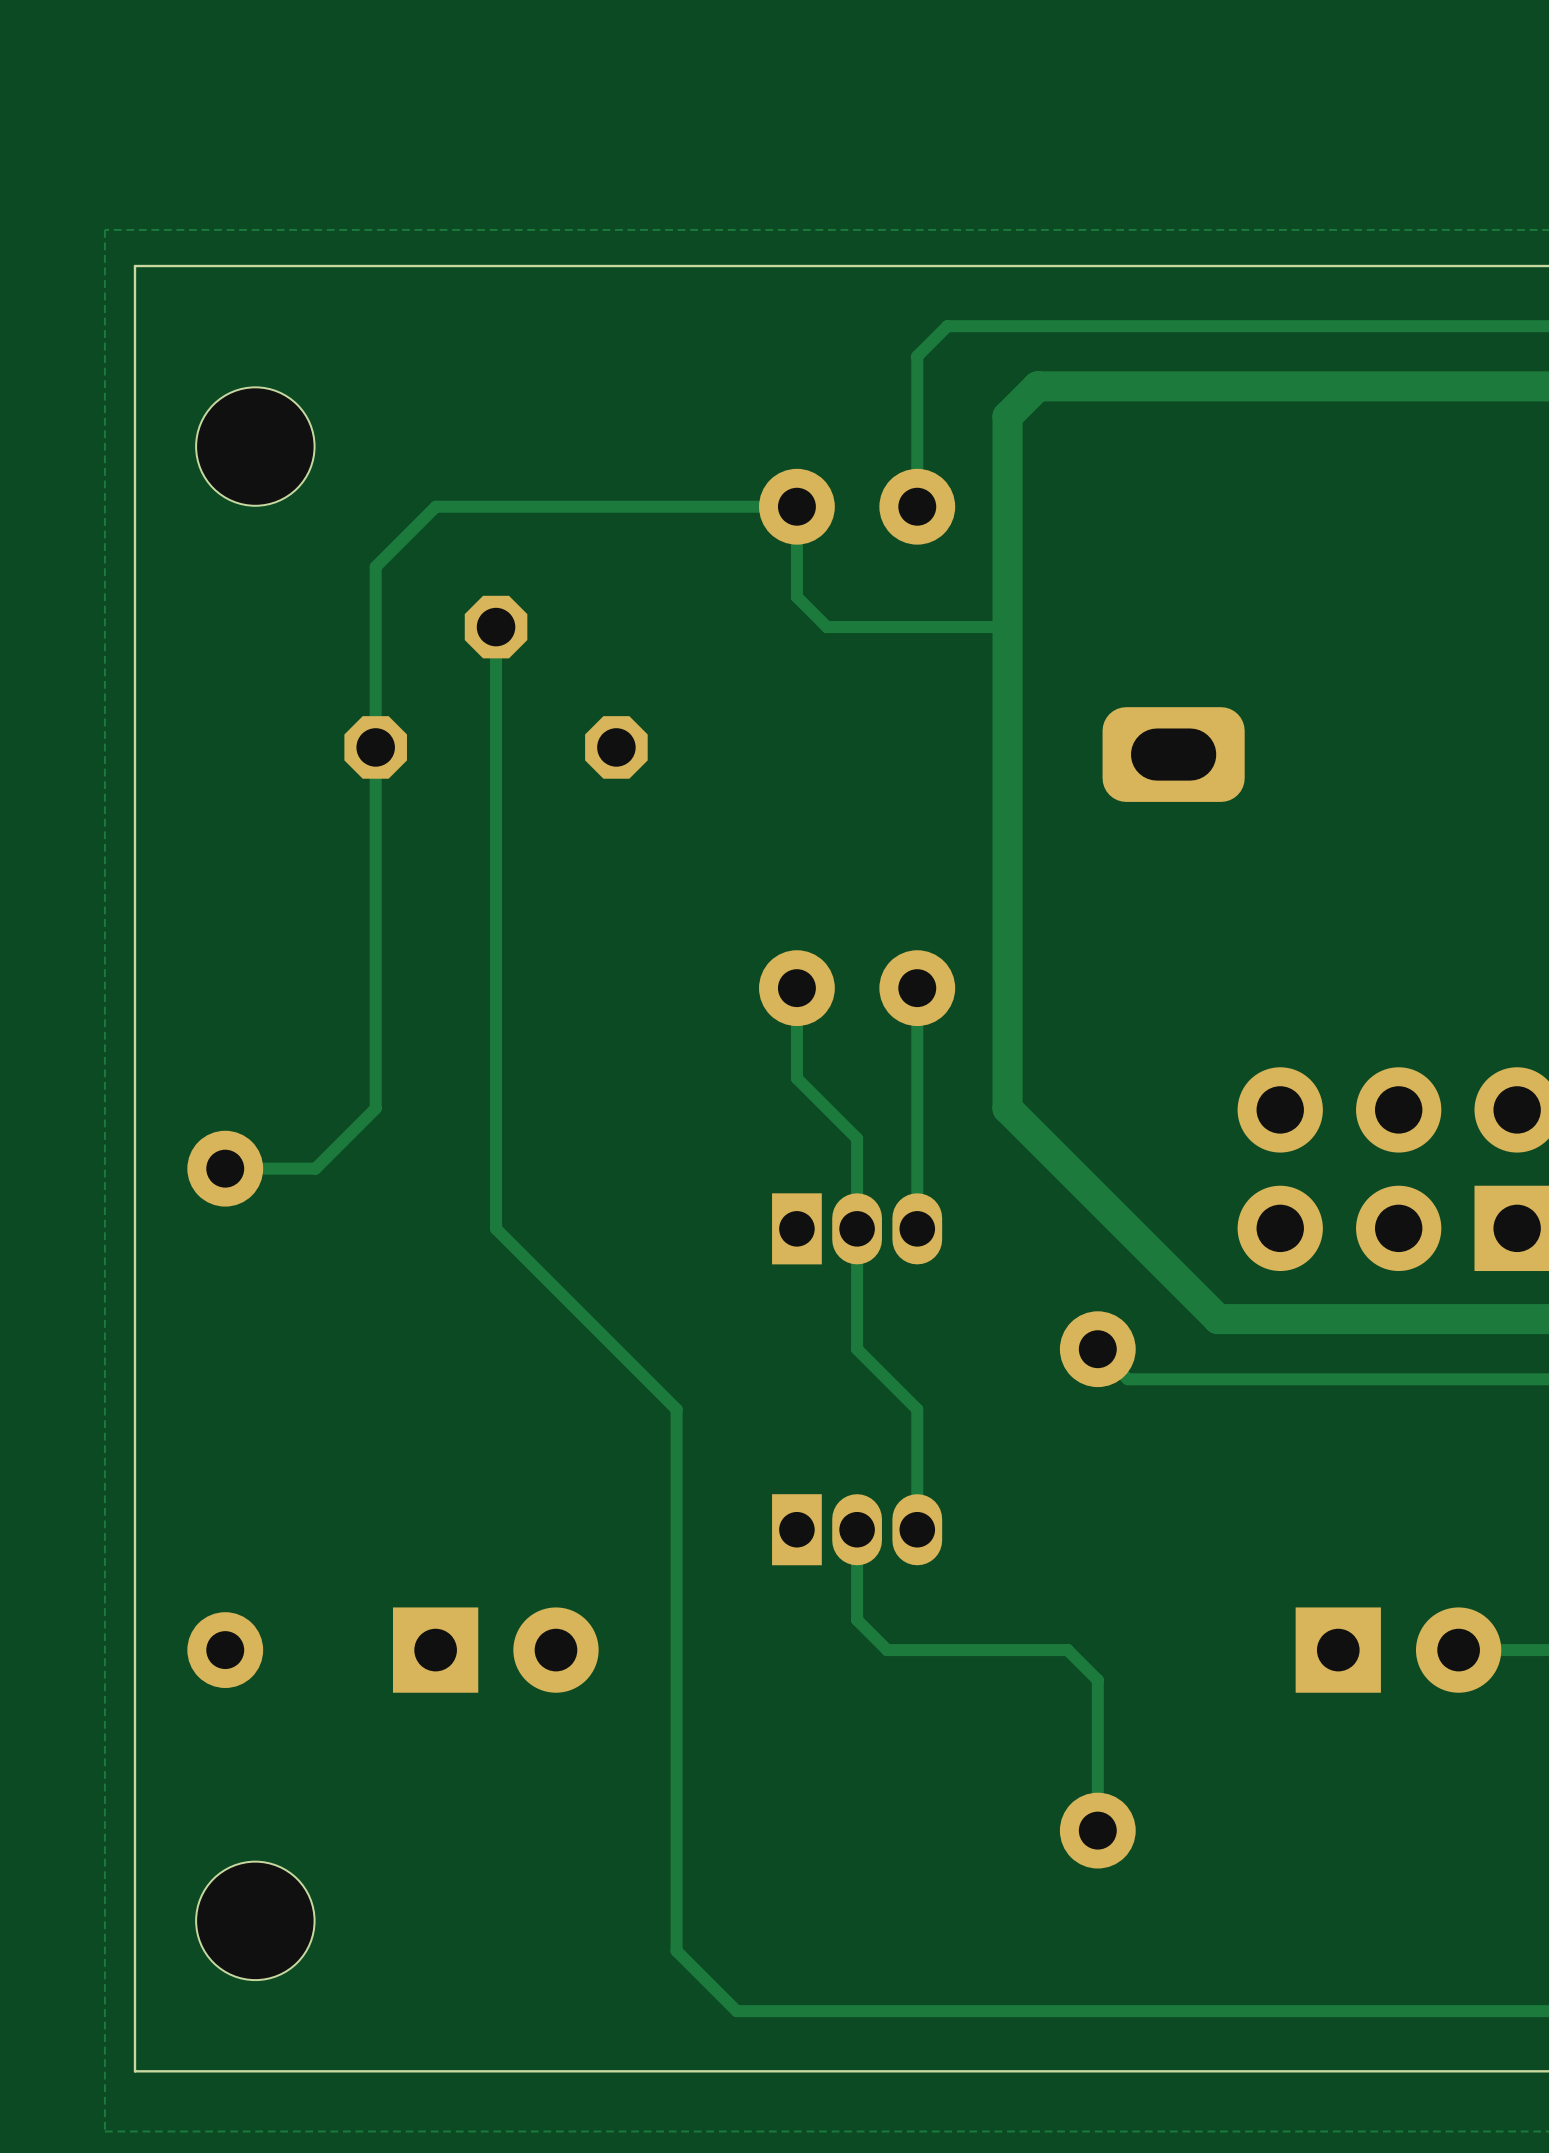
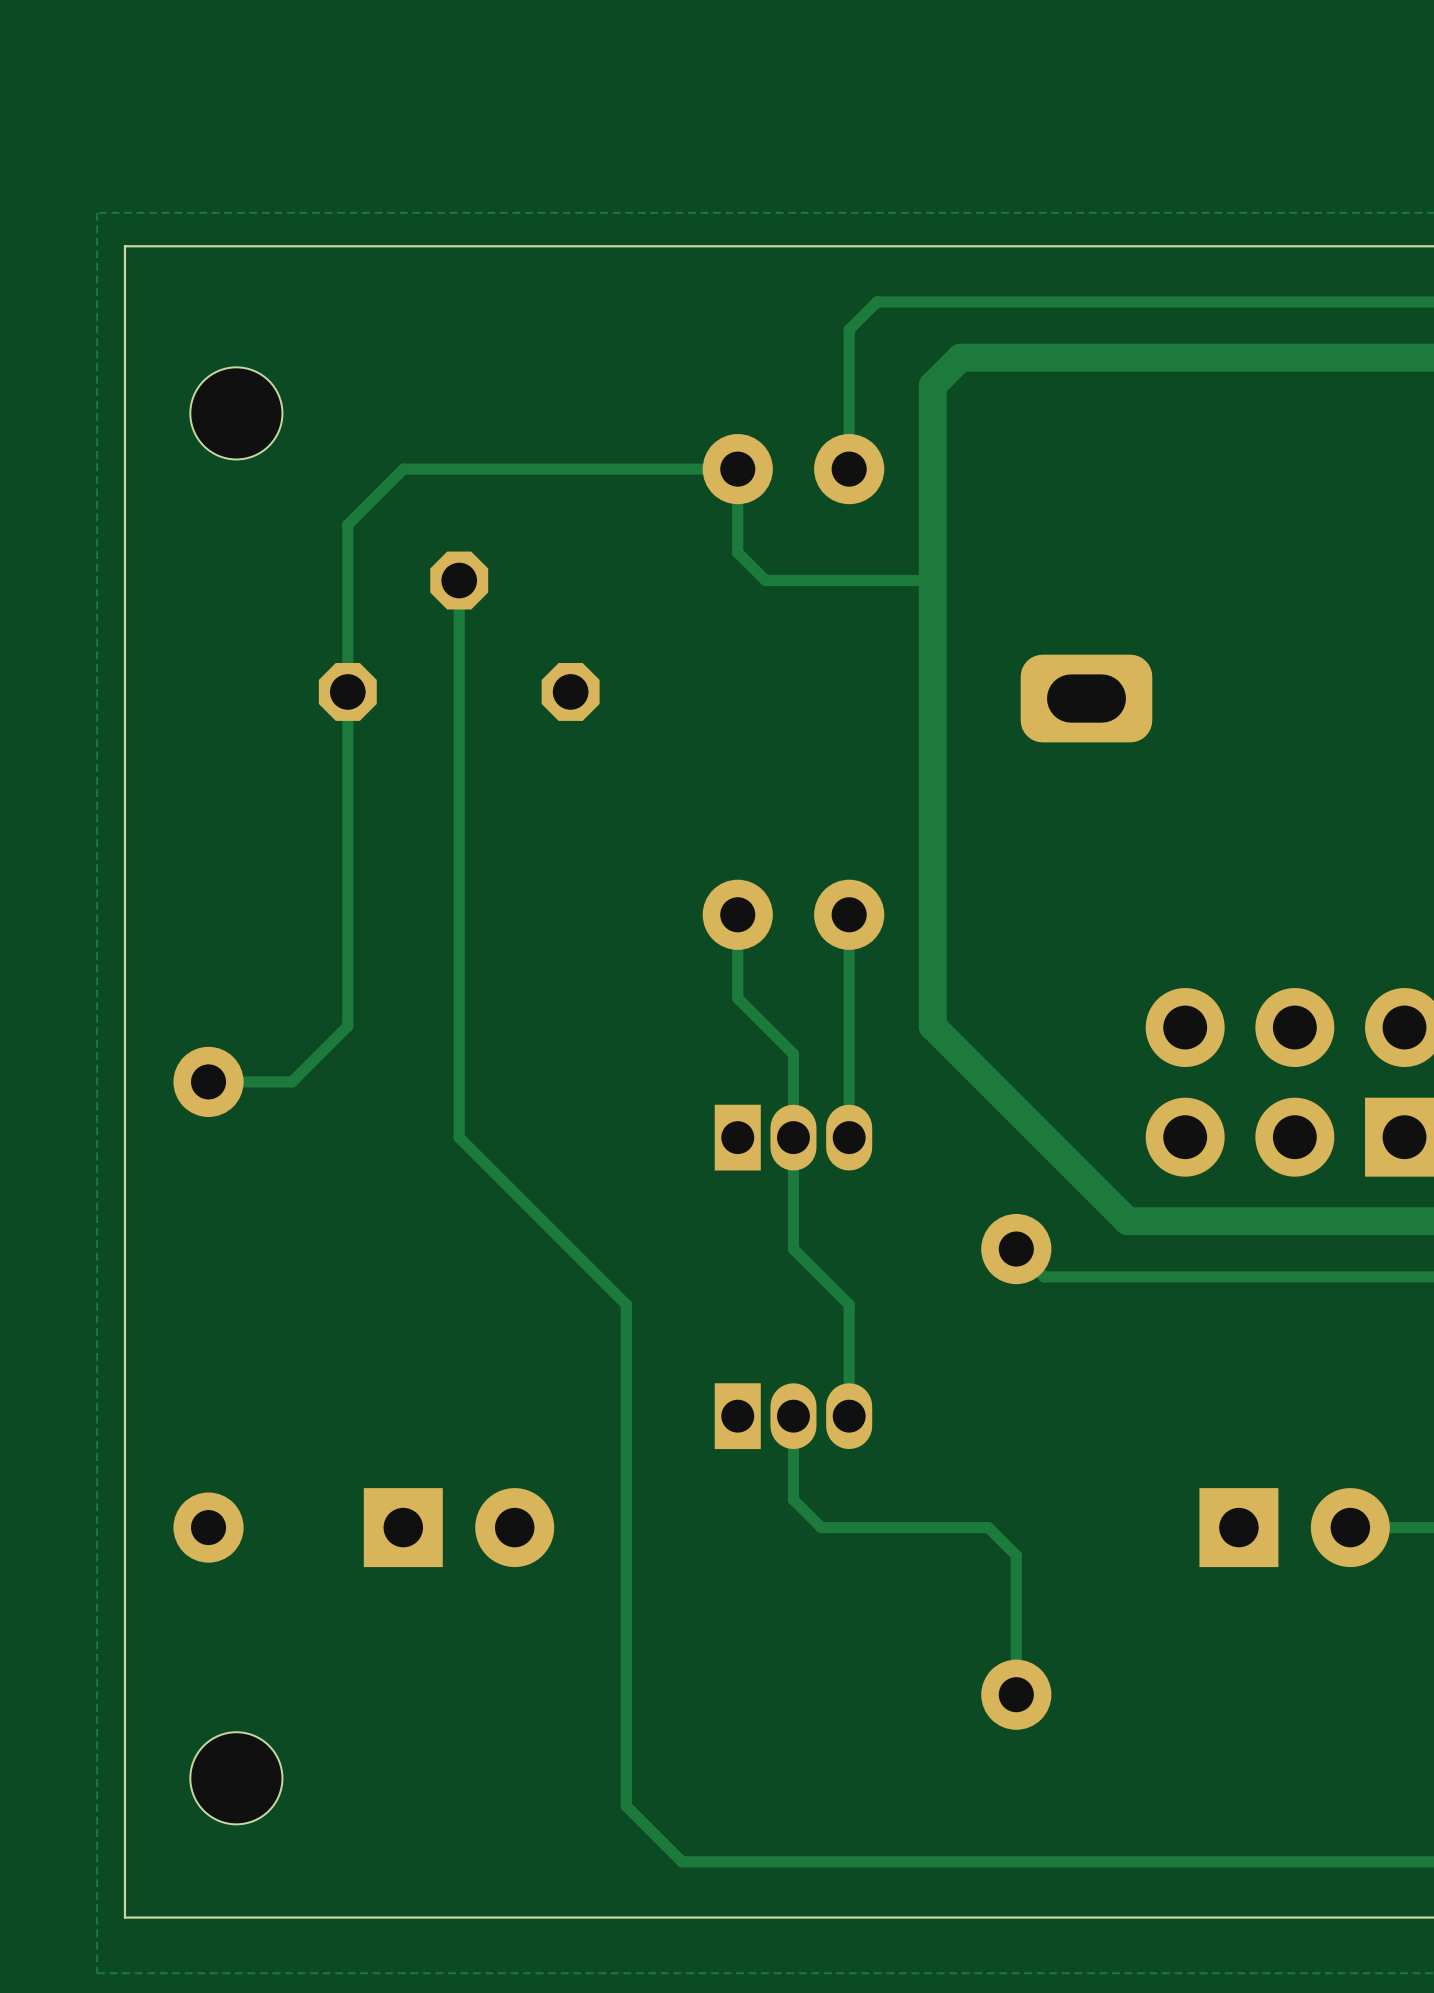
part footprint: [196, 387, 315, 506] -> [190, 367, 283, 460]
part footprint: [196, 1861, 315, 1981] -> [190, 1732, 283, 1825]

